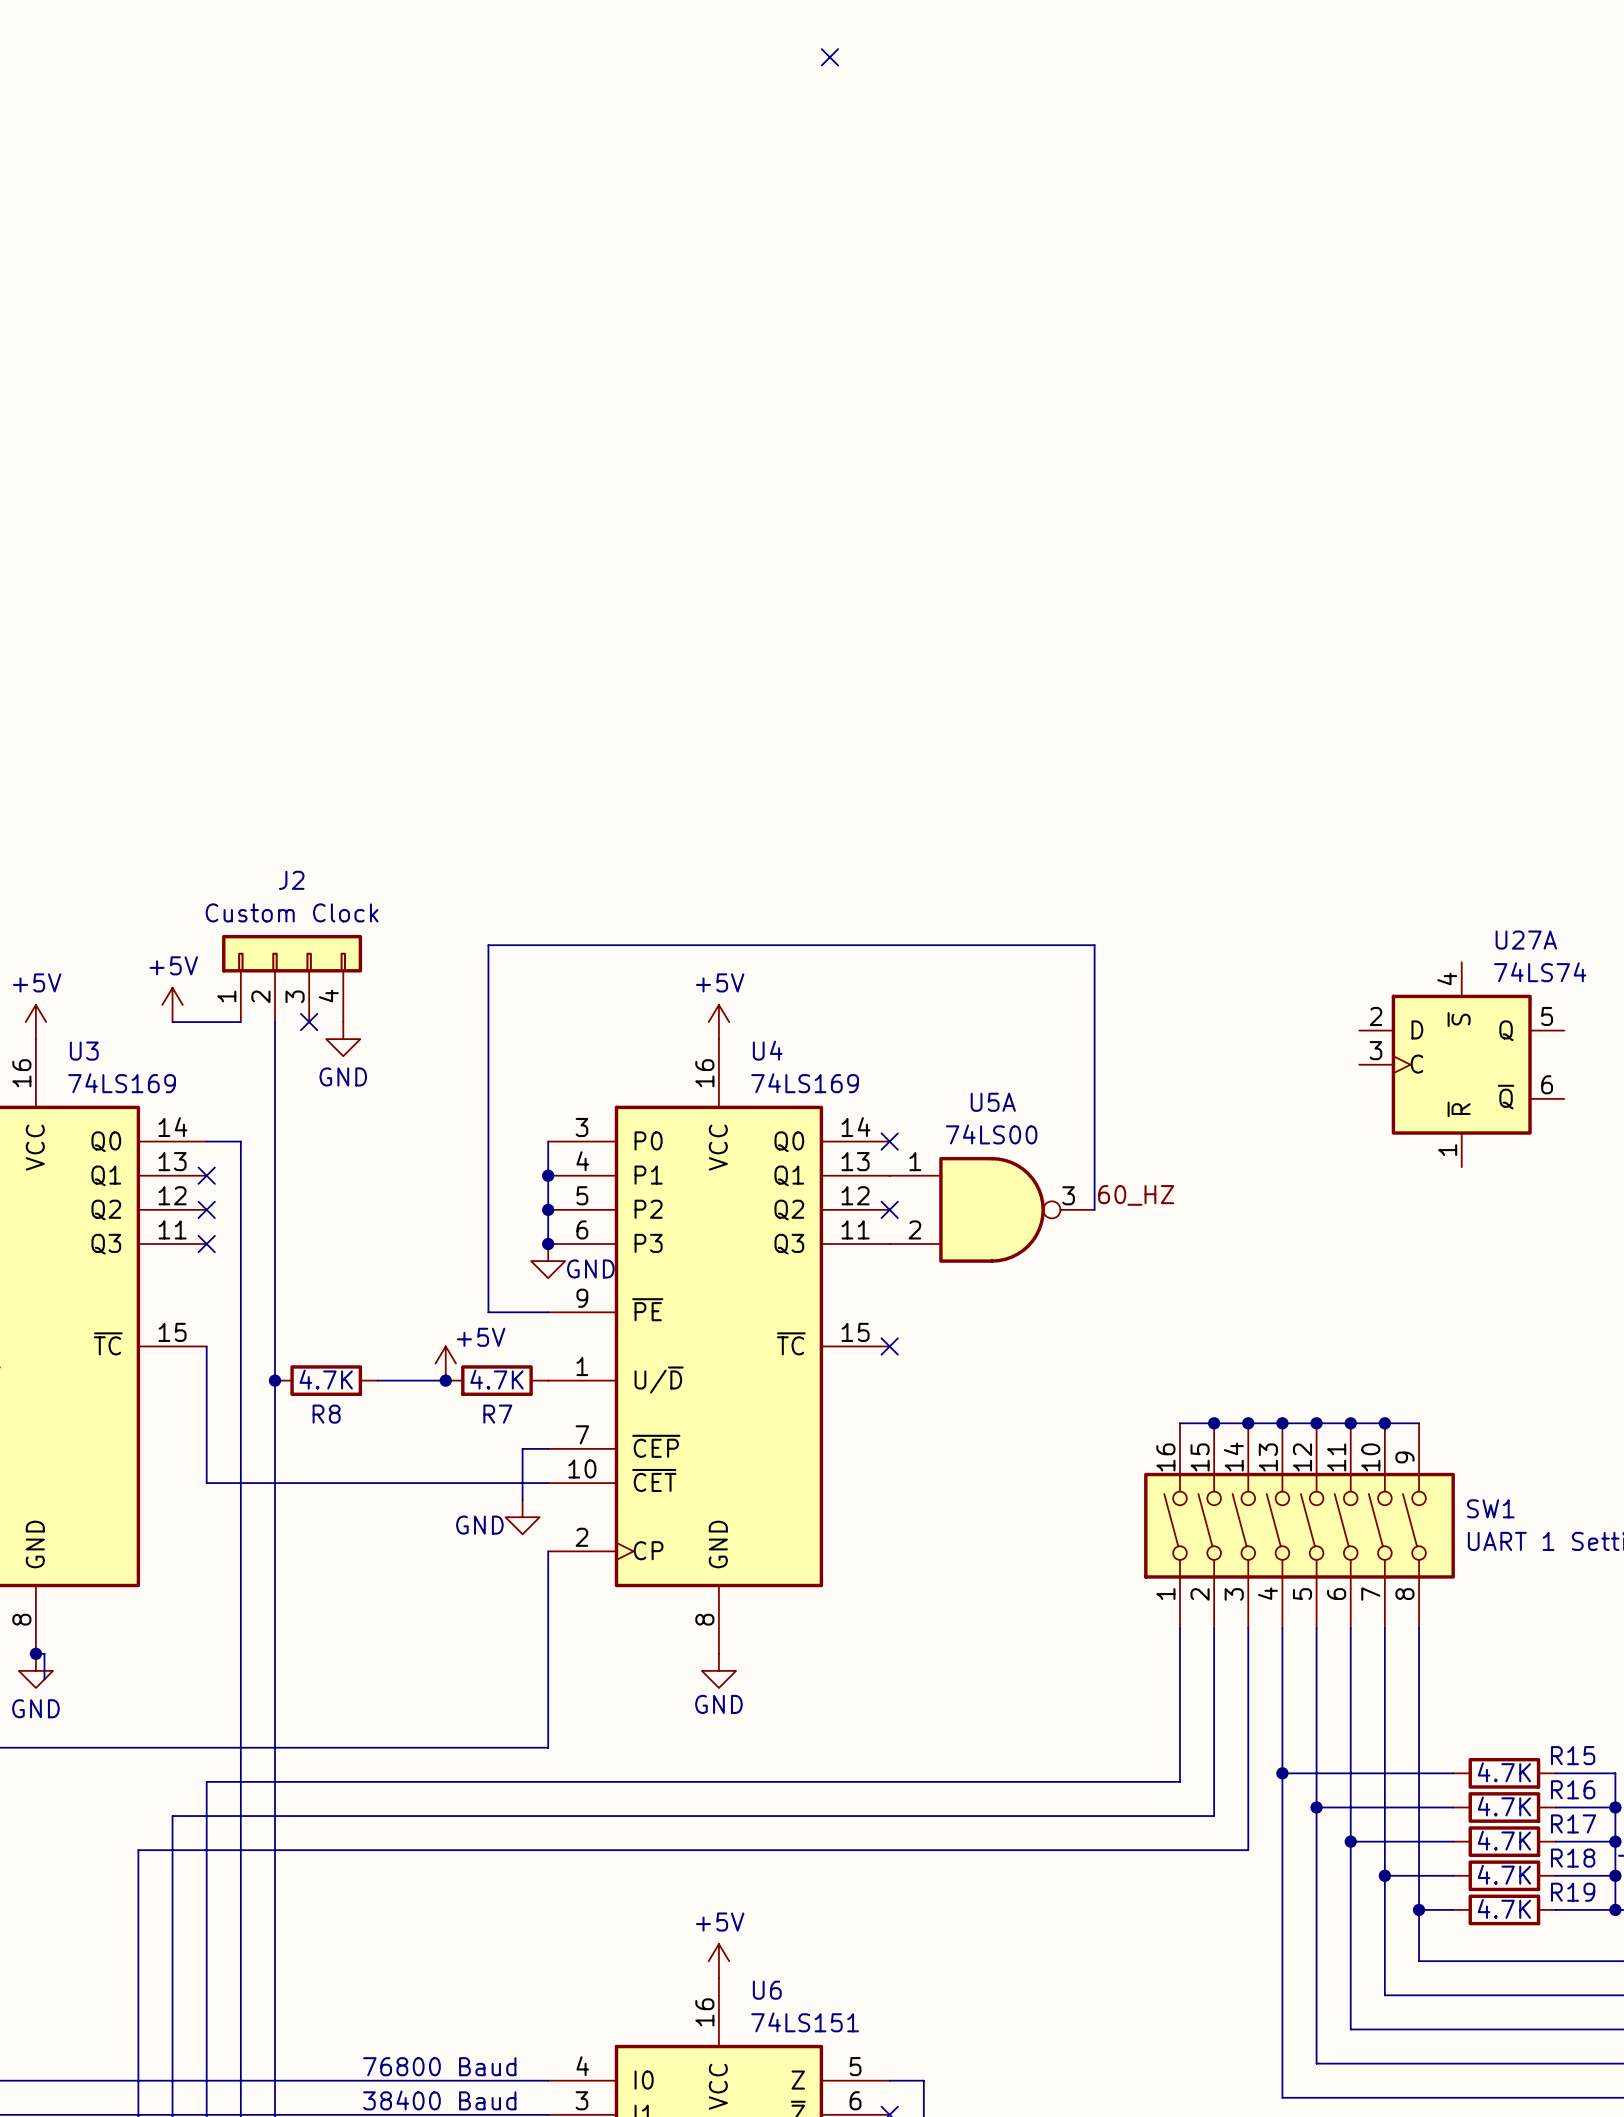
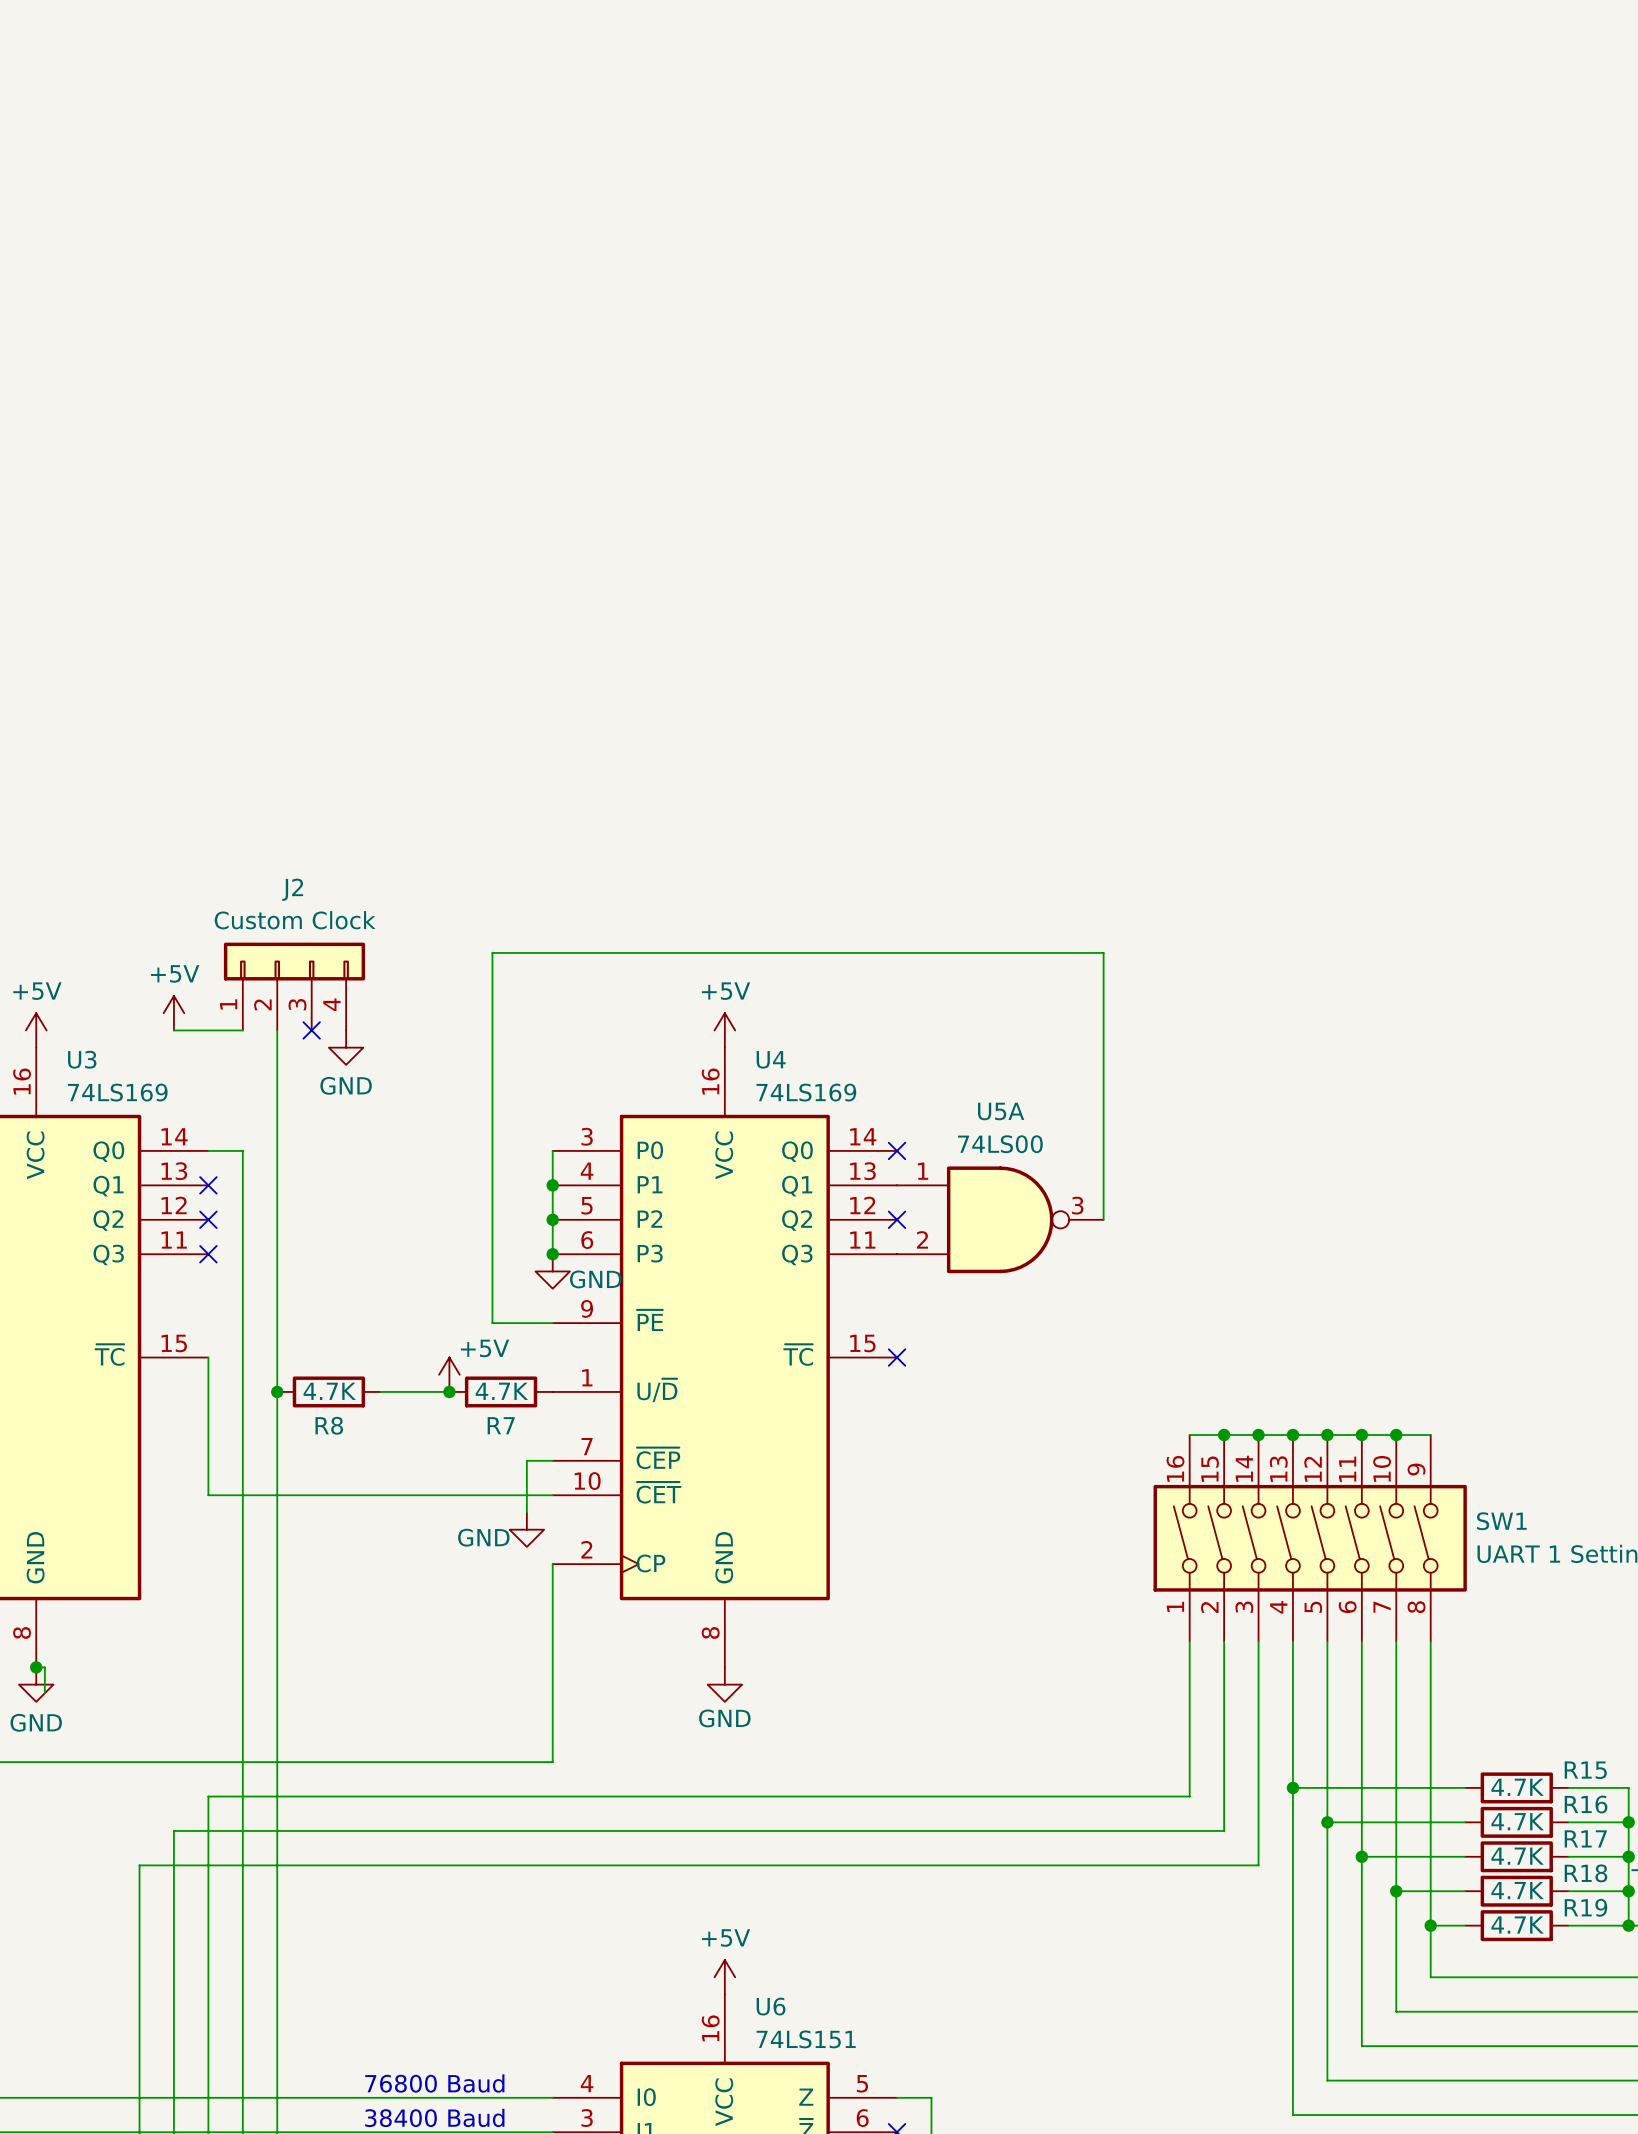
no-connect mark: (829, 57) -> none
U27A: 74LS74 (1461, 1064) -> none
label: 60_HZ (1136, 1195) -> none

